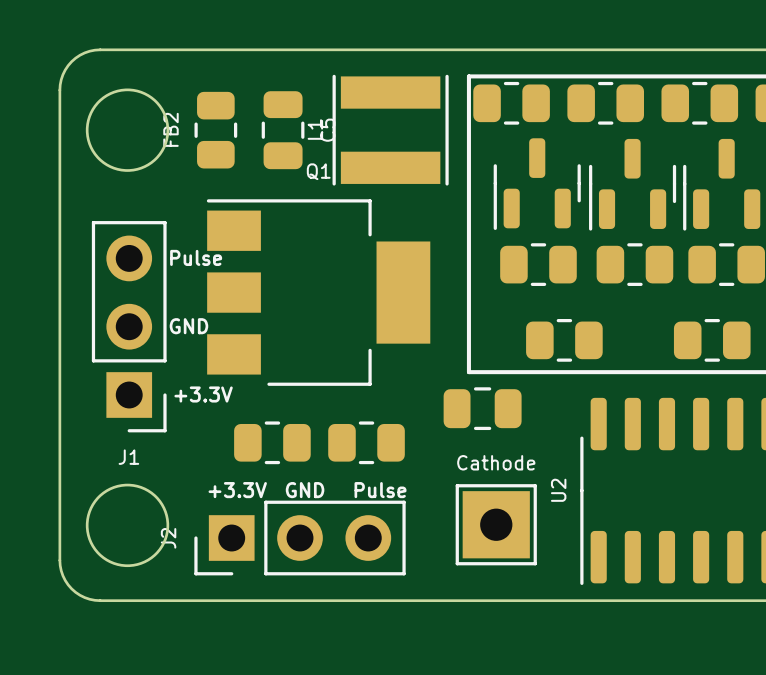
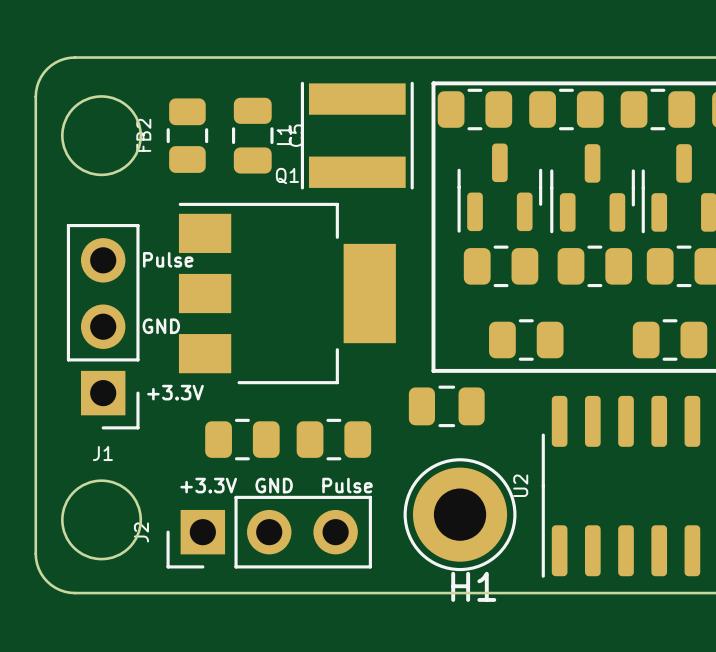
H1: none -> (460, 514)
part: Cathode (496, 524) -> none

